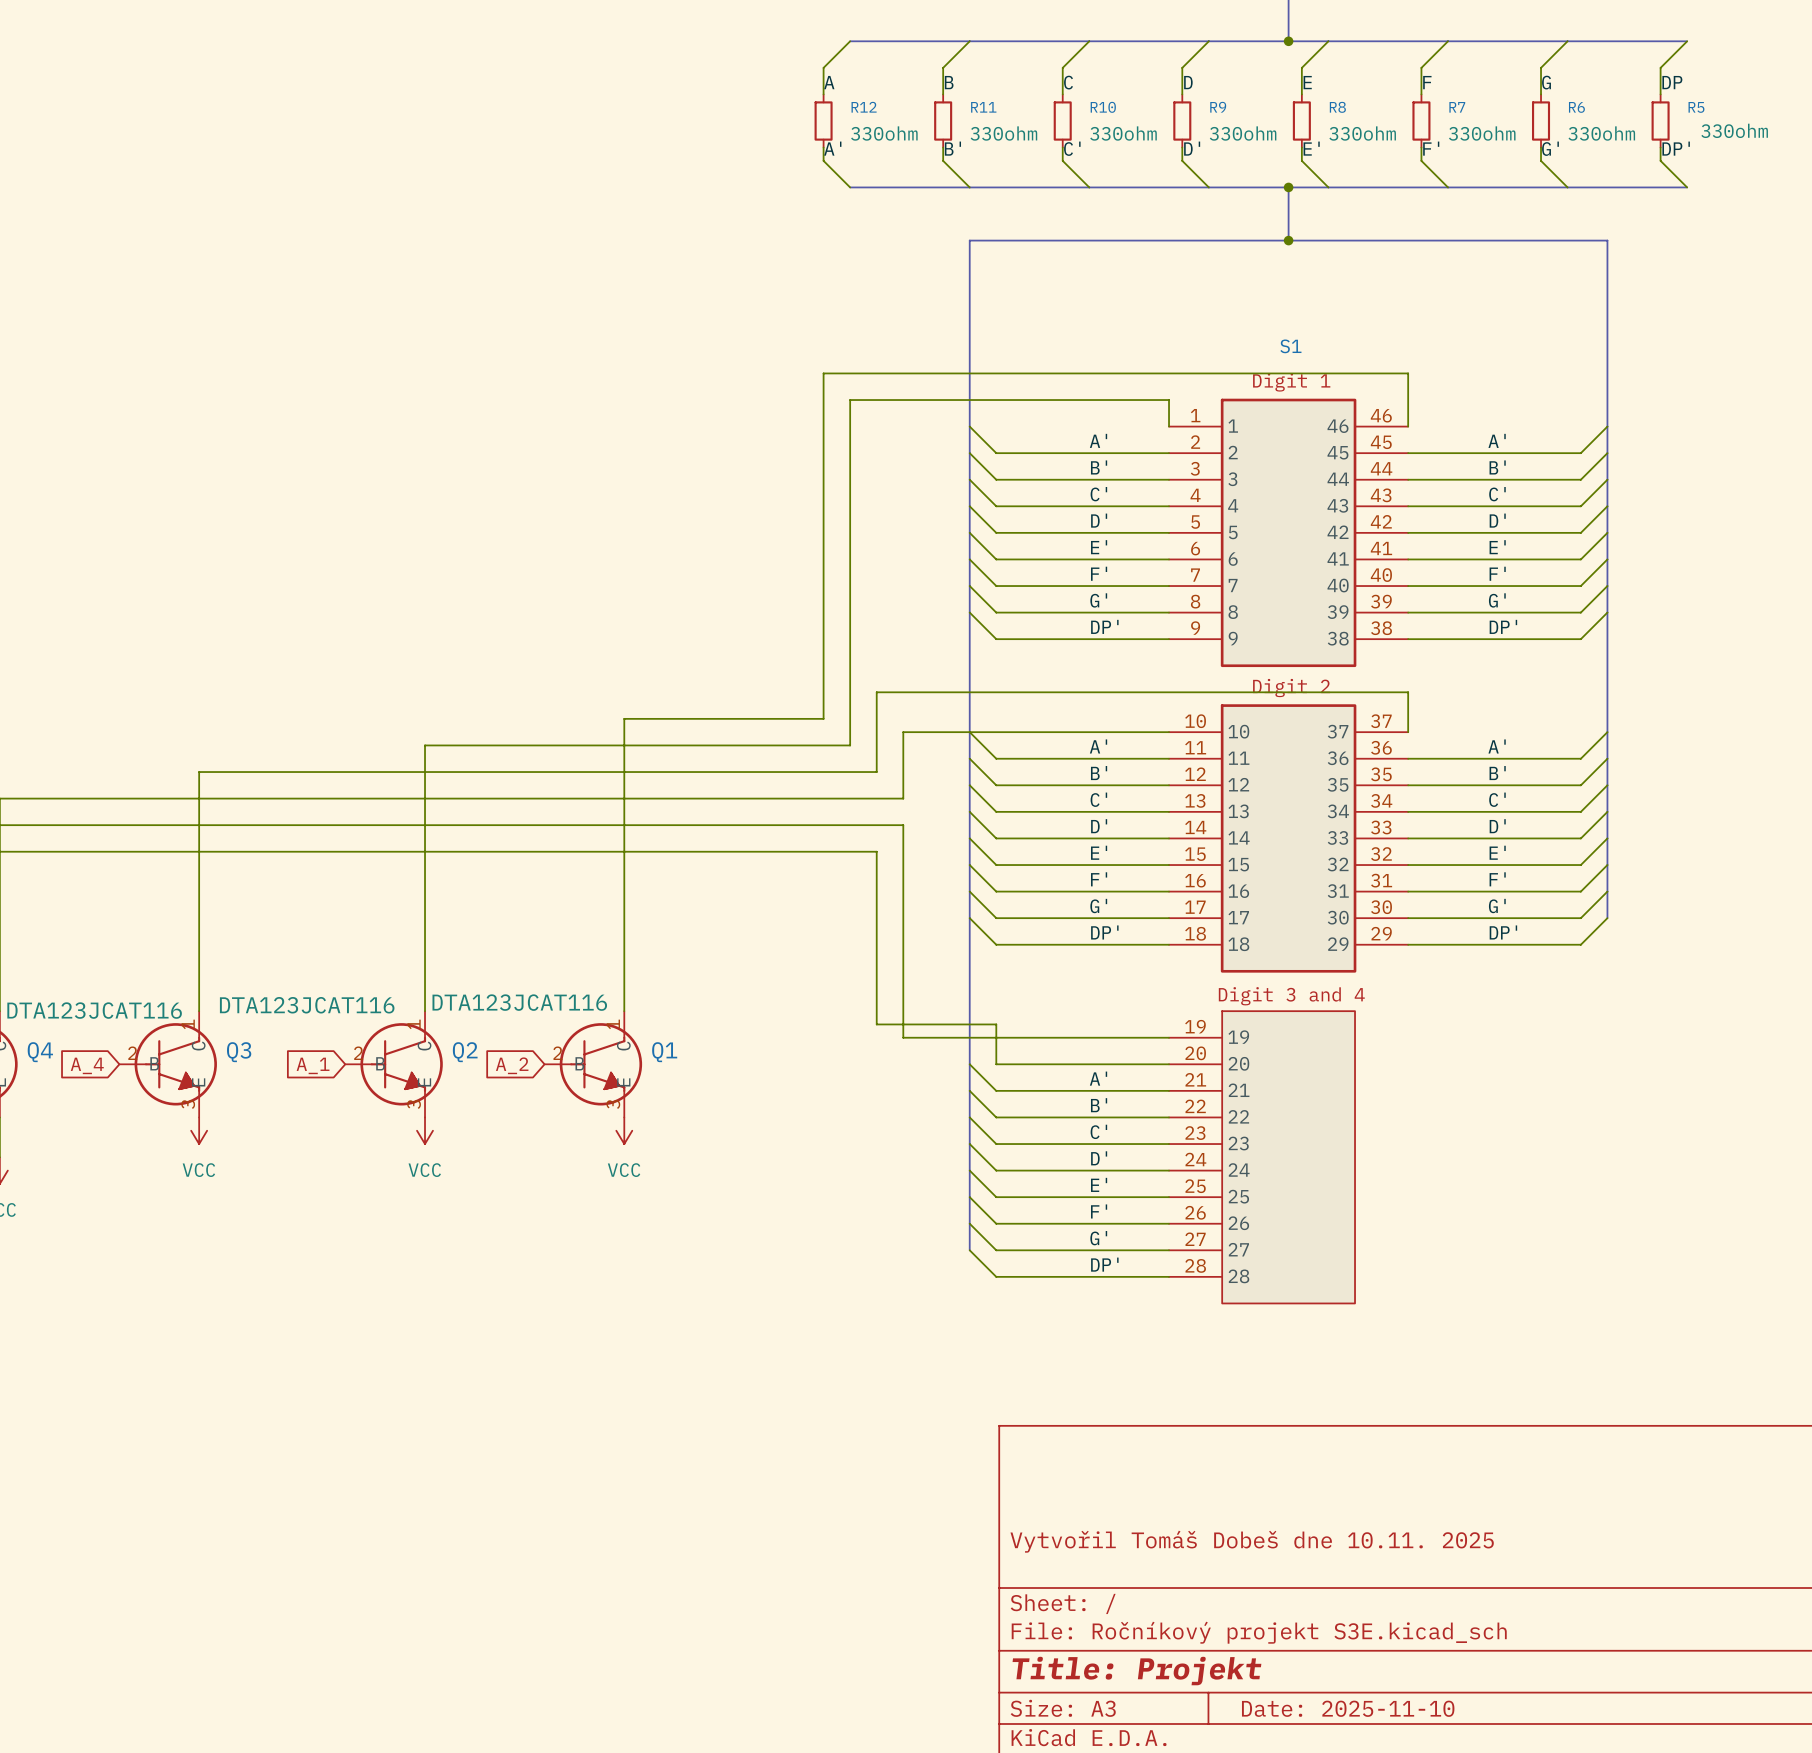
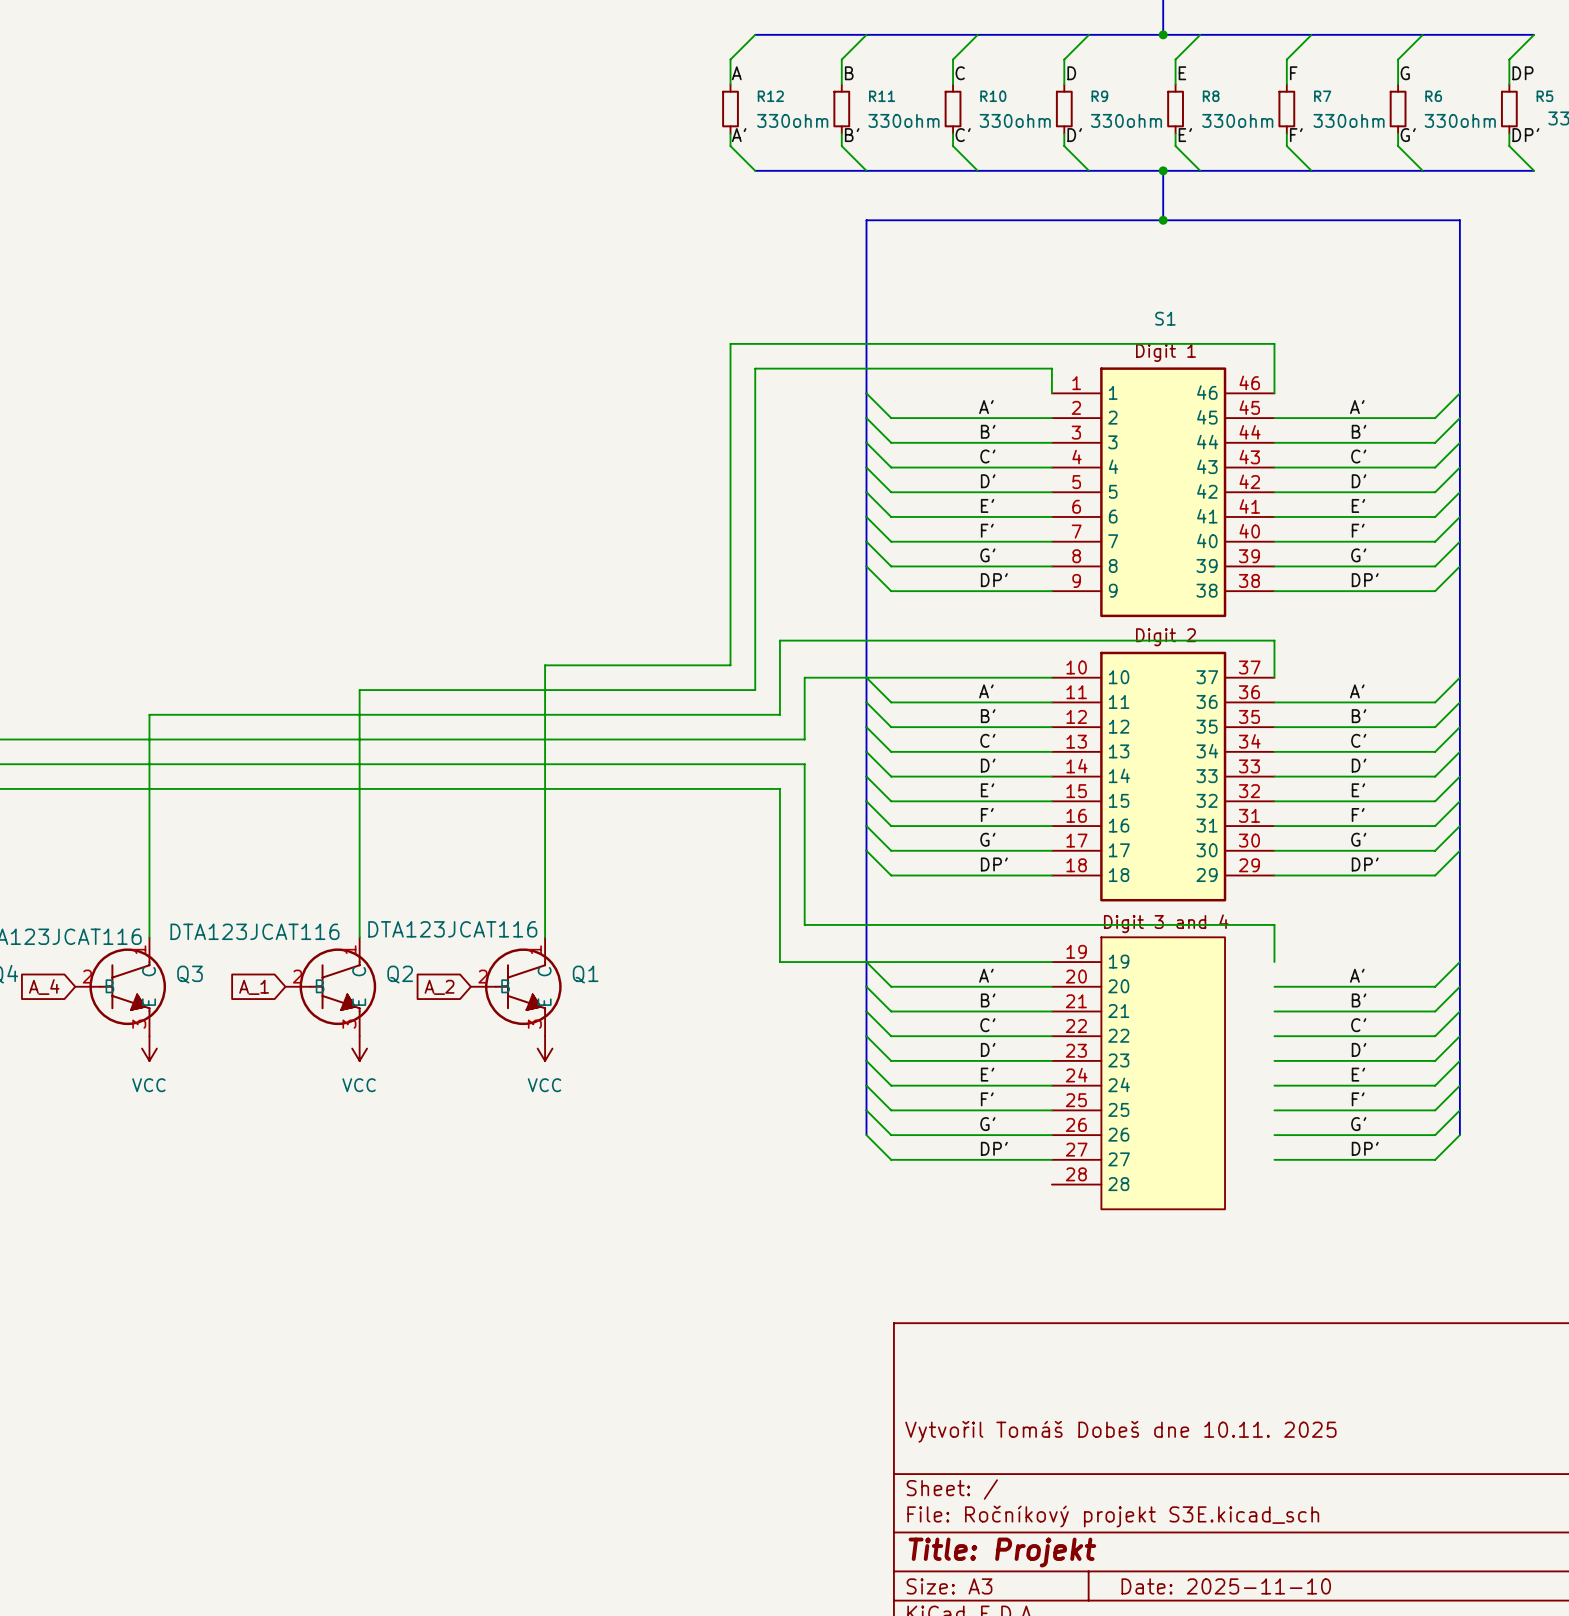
bus: none -> (1459, 850) (1459, 1135)
wire: (903, 997) (903, 1037) -> (779, 949) (779, 962) (804, 962)
wire: none -> (804, 924) (1274, 924) (1274, 962)
wire: (876, 1024) (996, 1024) (996, 1064) -> (866, 962) (891, 986)
wire: none -> (1459, 962) (1435, 986) (1274, 986)
label: none -> A' (986, 975)
label: none -> A' (1357, 975)
wire: none -> (1459, 986) (1435, 1011) (1274, 1011)
label: A' (1098, 1078) -> B' (988, 1000)
label: none -> B' (1359, 1000)
wire: none -> (1459, 1011) (1435, 1036) (1274, 1036)
label: B' (1099, 1105) -> C' (987, 1025)
label: none -> C' (1358, 1025)
wire: none -> (1459, 1036) (1435, 1060) (1274, 1060)
label: C' (1098, 1131) -> D' (988, 1049)
label: none -> D' (1359, 1049)
wire: none -> (1459, 1060) (1435, 1085) (1274, 1085)
label: D' (1099, 1158) -> E' (987, 1074)
label: none -> E' (1358, 1074)
wire: none -> (1459, 1085) (1435, 1110) (1274, 1110)
label: E' (1099, 1184) -> F' (987, 1099)
label: none -> F' (1358, 1099)
wire: none -> (1459, 1110) (1435, 1135) (1274, 1135)
label: F' (1099, 1211) -> G' (987, 1124)
label: none -> G' (1358, 1124)
bus: (969, 1223) (969, 1250) -> none
wire: none -> (1459, 1135) (1435, 1159) (1274, 1159)
label: G' (1098, 1238) -> DP' (994, 1148)
label: none -> DP' (1365, 1148)
wire: (969, 1250) (996, 1276) (1169, 1276) -> none
label: DP' (1104, 1264) -> none

